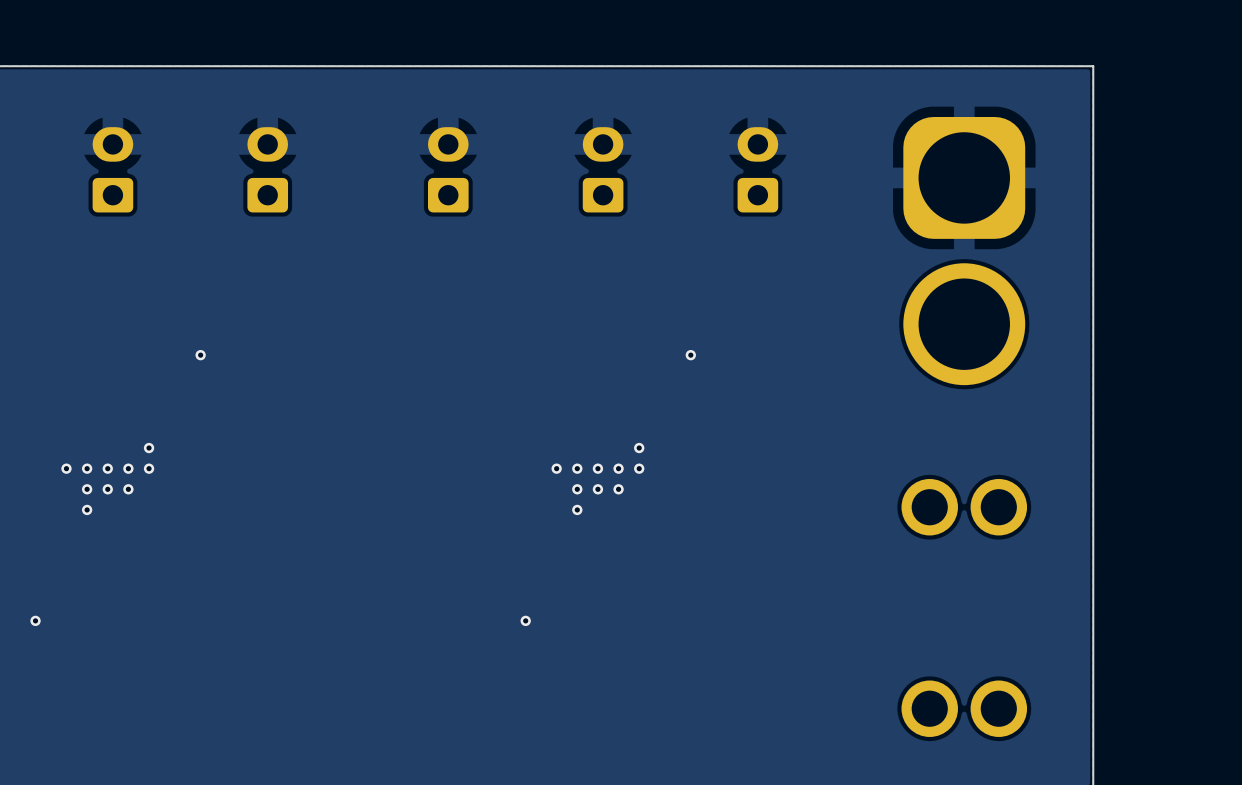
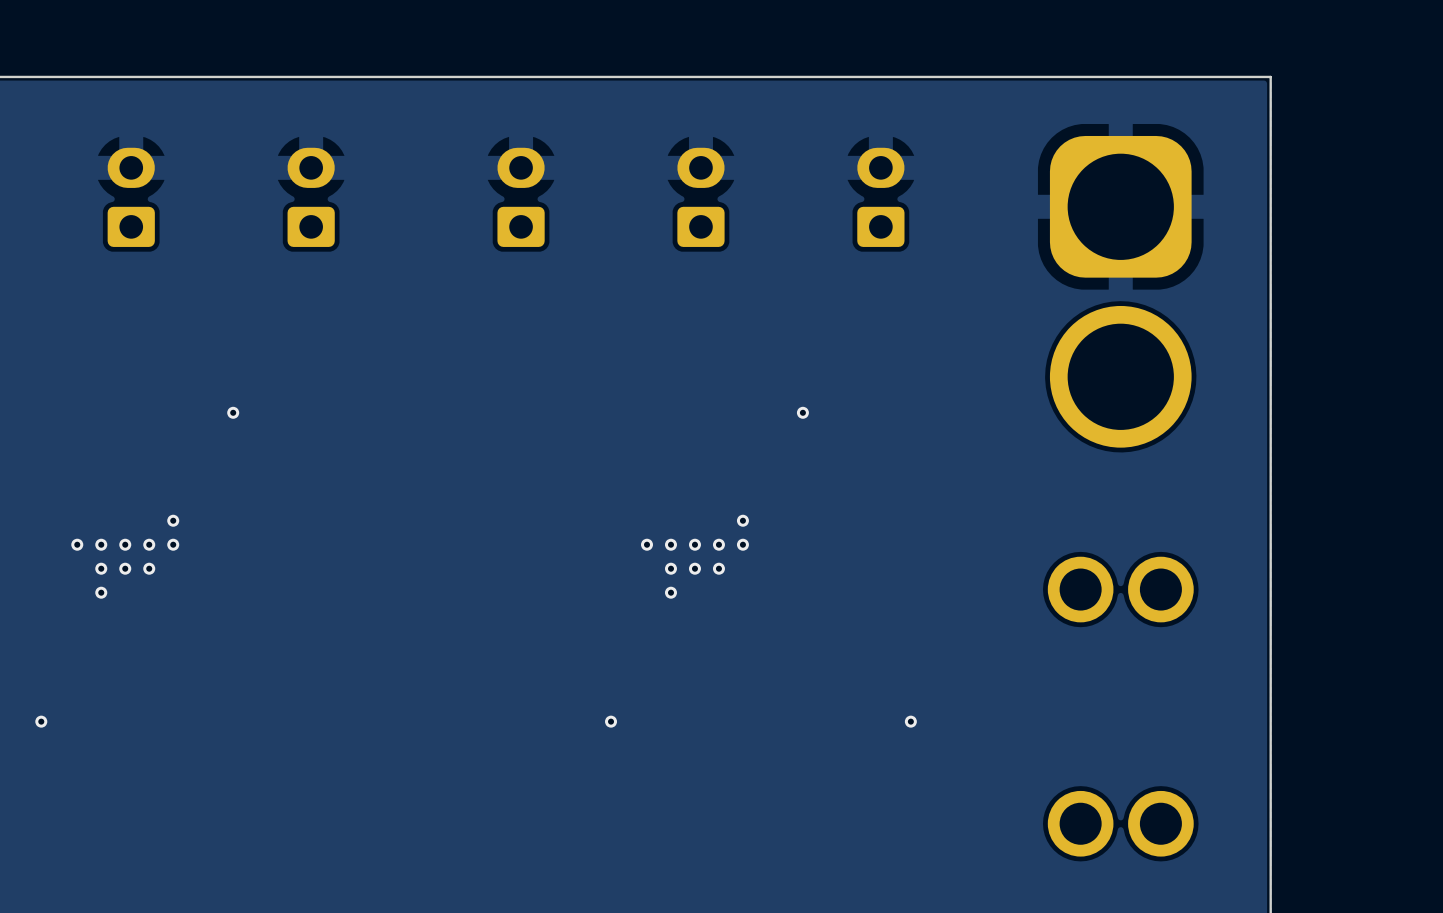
via: none -> (910, 721)

